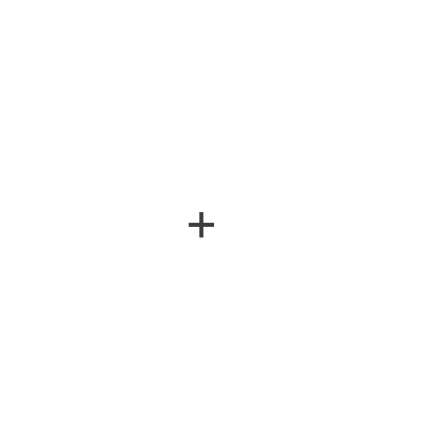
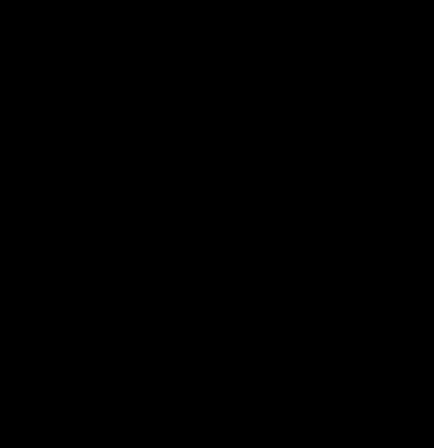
text: + (201, 224) -> none

